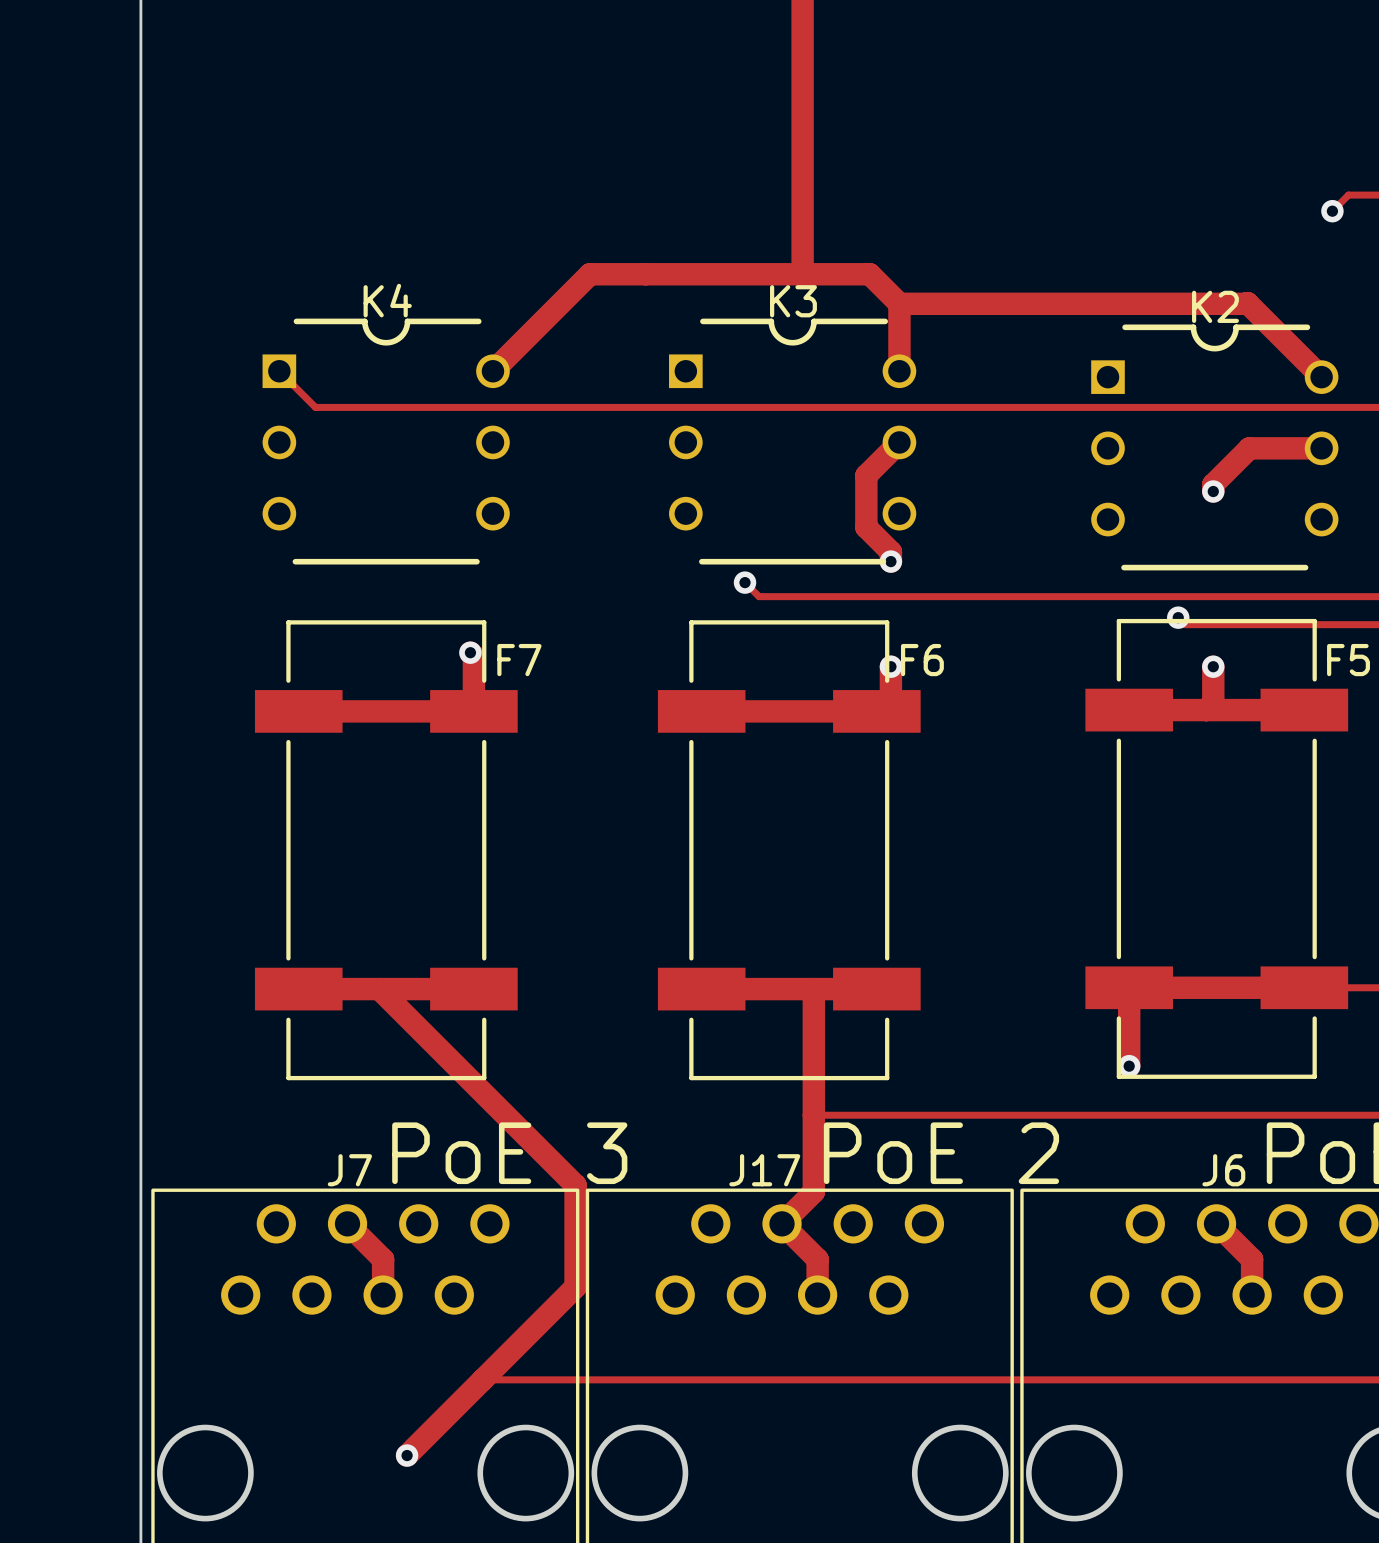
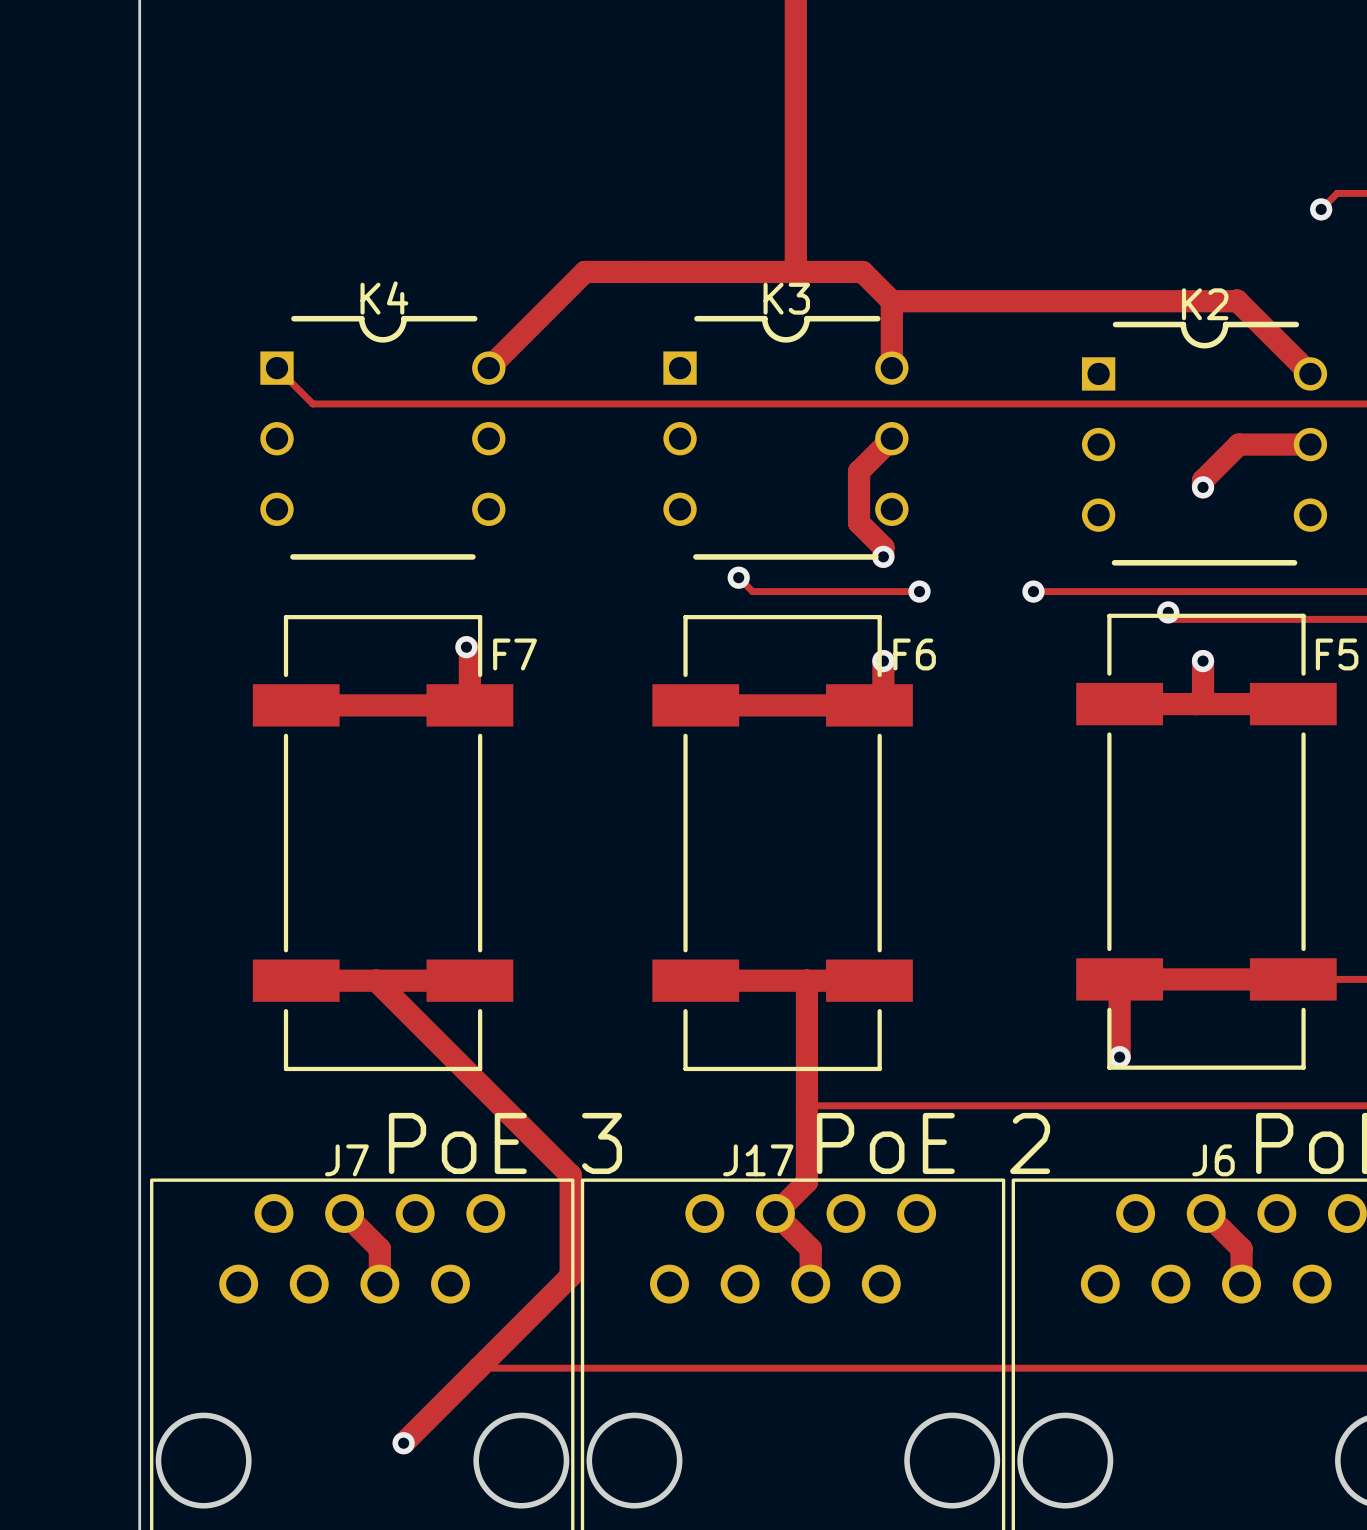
track: (927, 596) (1042, 596) -> none
via: none -> (919, 591)
via: none -> (1033, 591)

